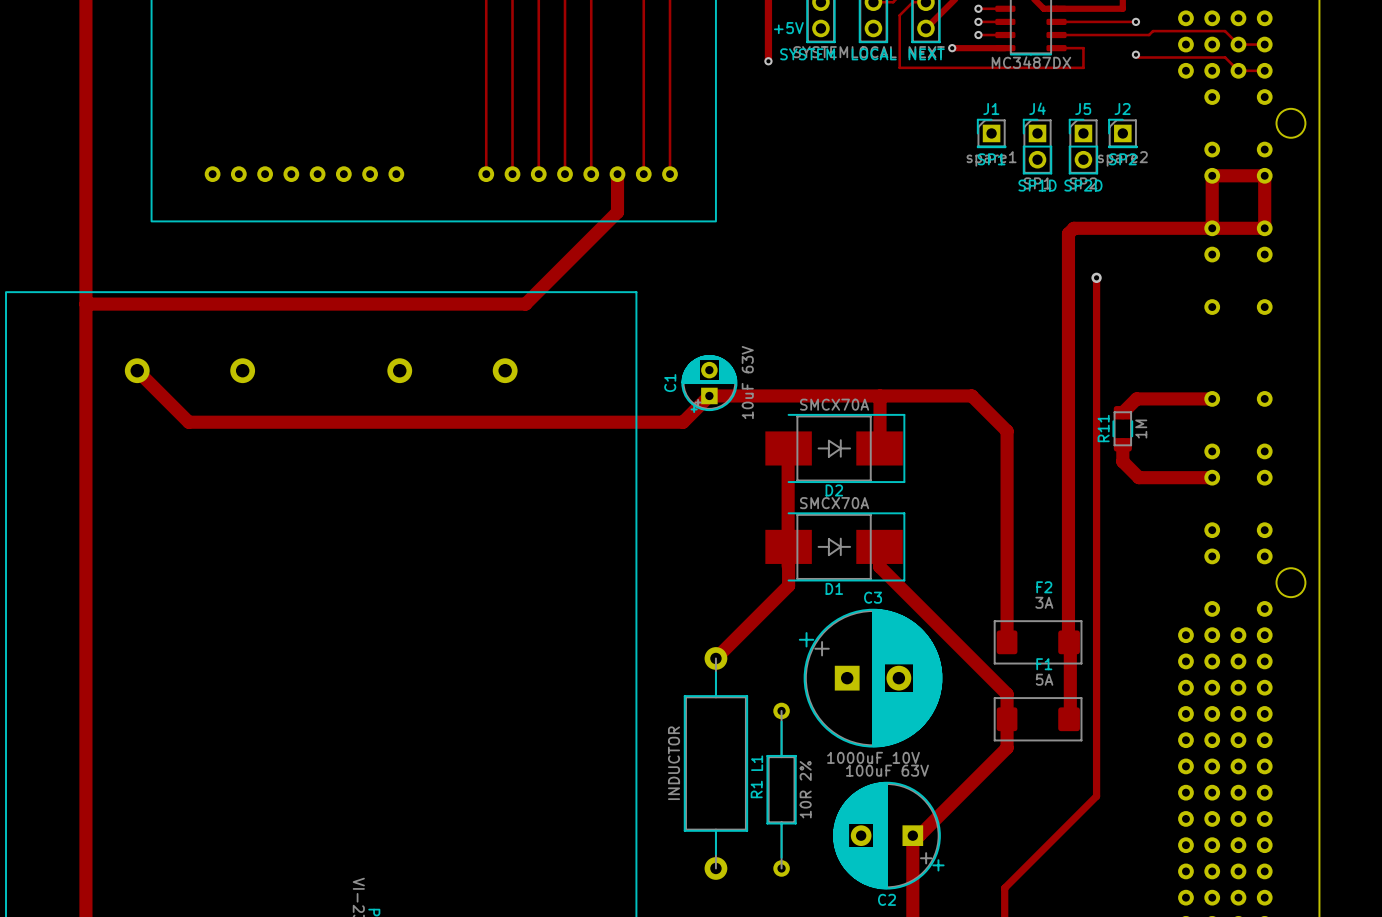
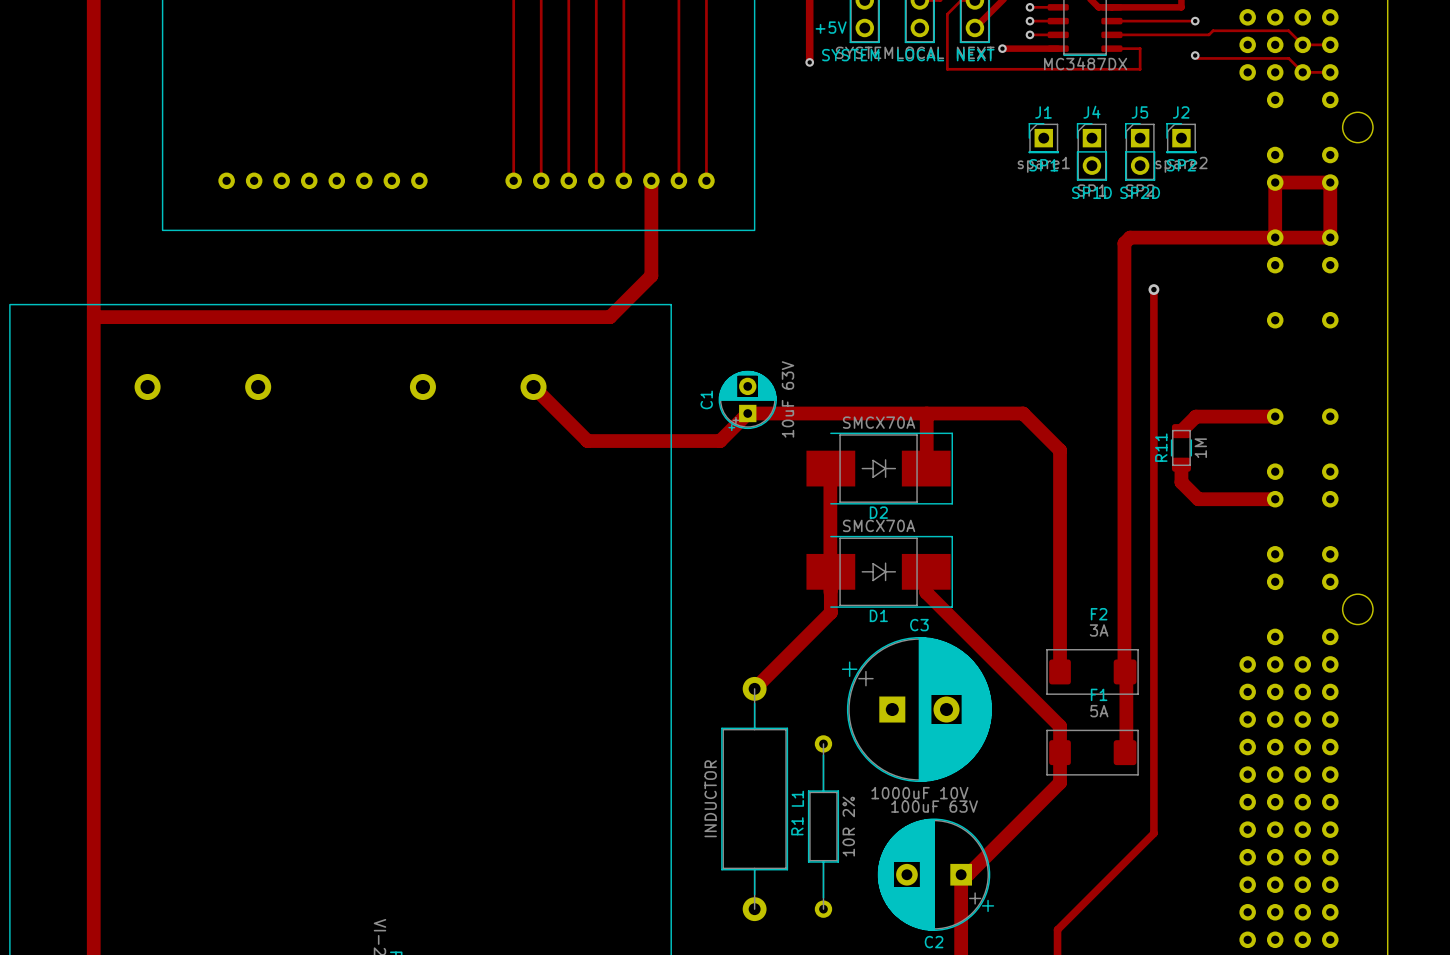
track: (617, 212) (525, 304) -> (651, 220) (651, 275) (610, 317) (554, 317)
track: (137, 370) (188, 422) (556, 422) -> (533, 386) (587, 441)

